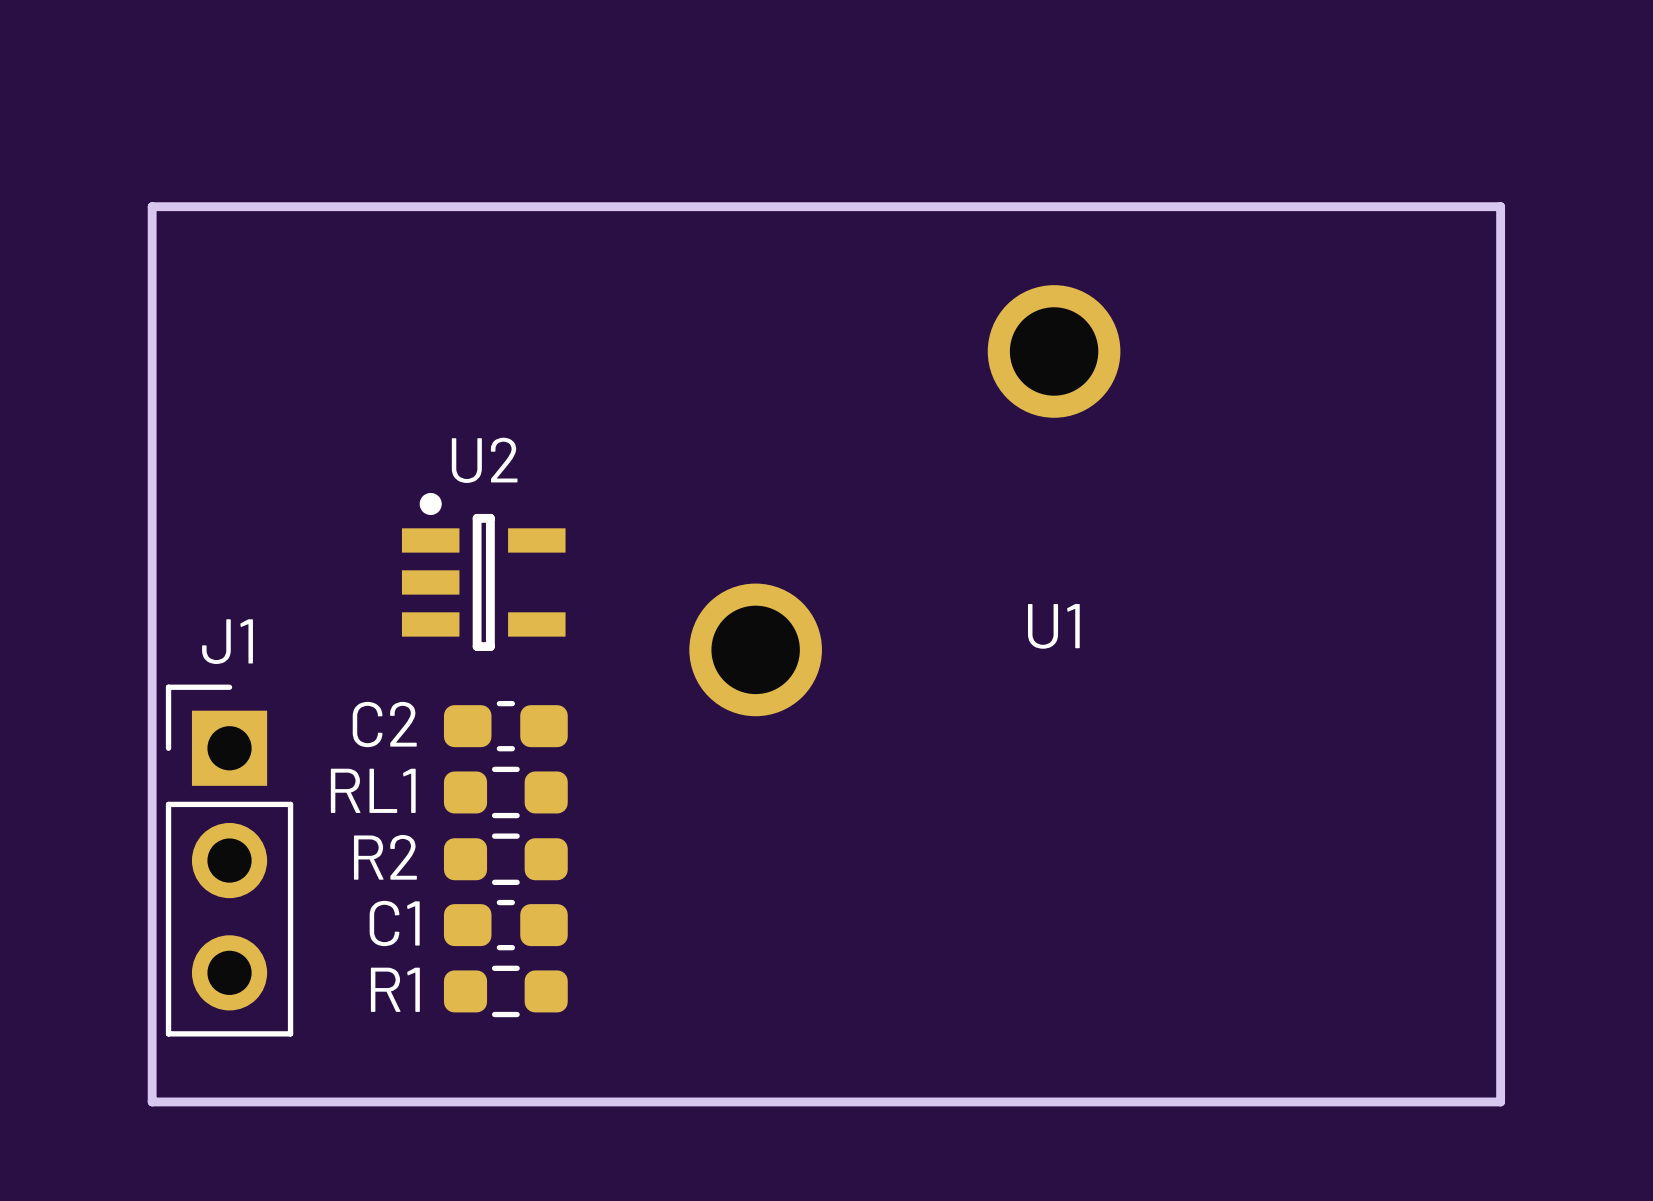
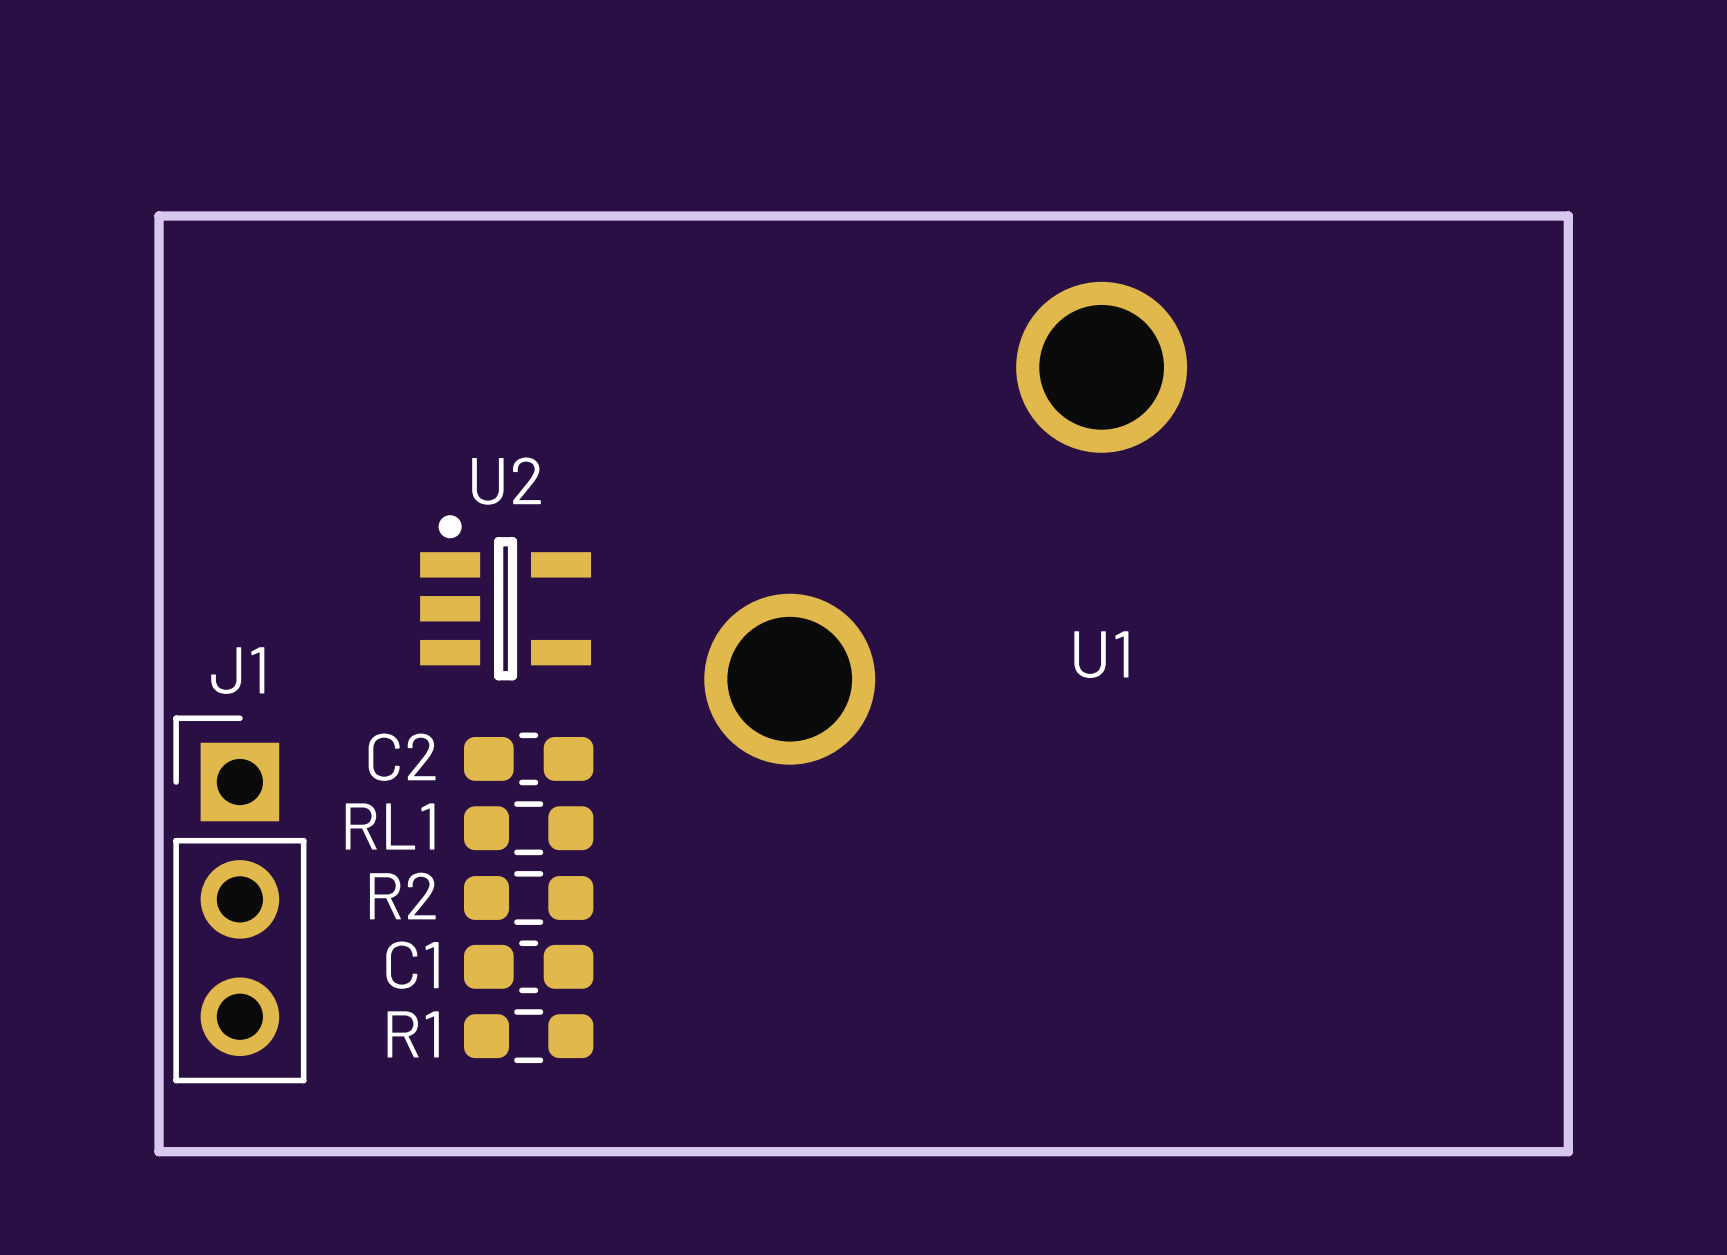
U1 footprint: [689, 285, 1121, 717] -> [704, 281, 1188, 765]

